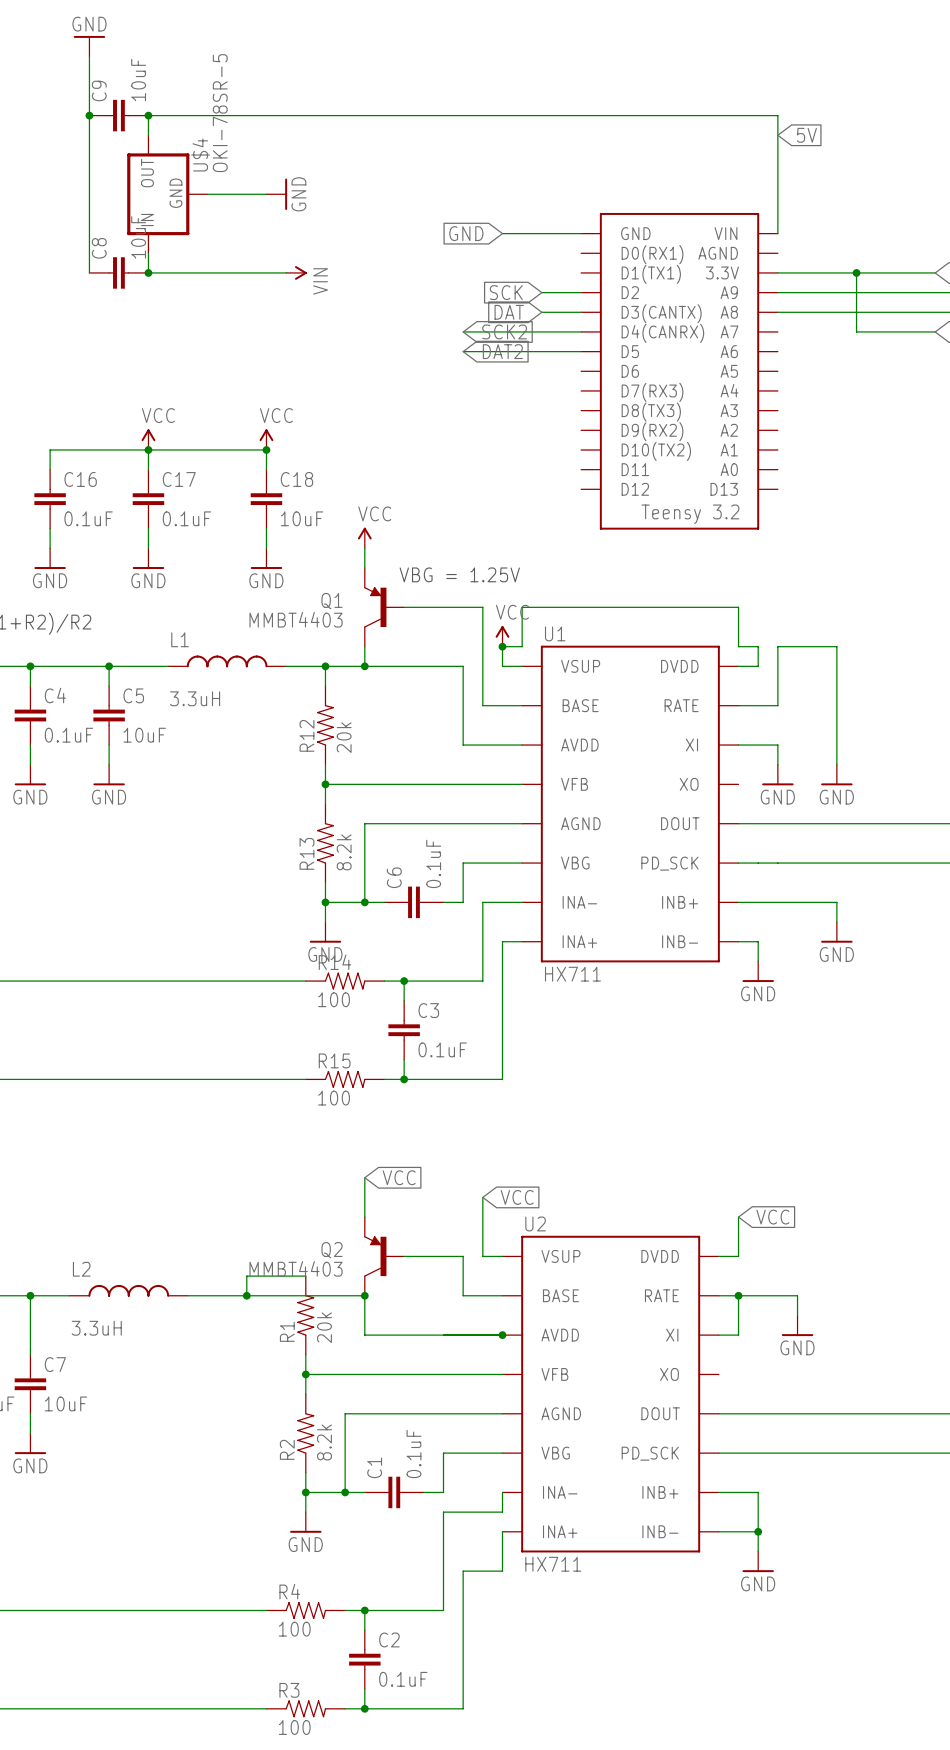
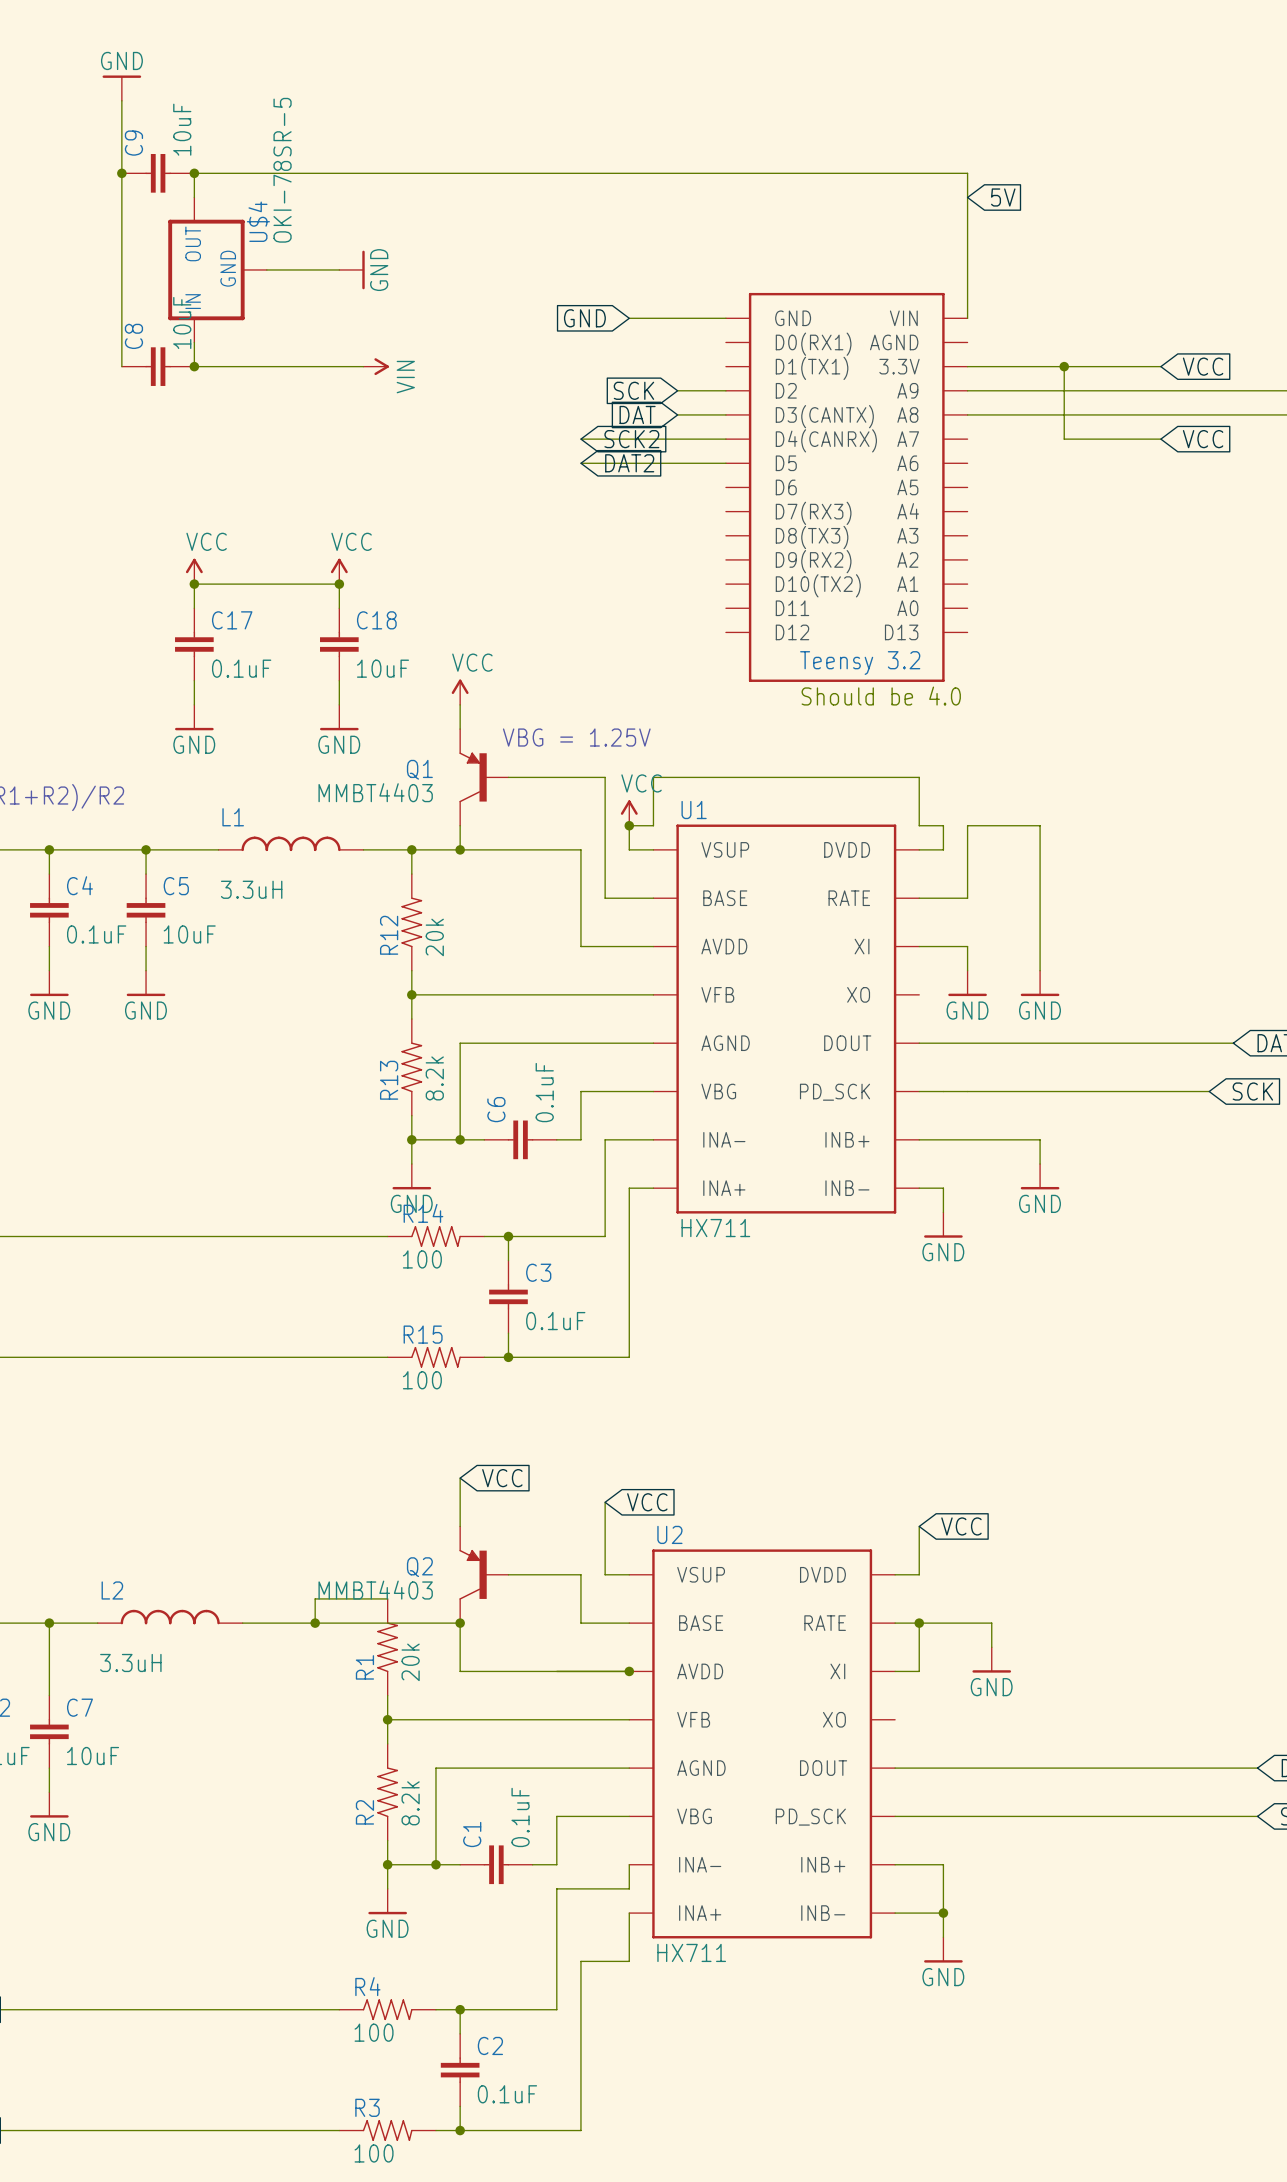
wire: (148, 449) (50, 449) (50, 469) -> none
C16: 0.1uF (50, 499) -> none
wire: (50, 528) (50, 548) -> none
text: none -> Should be 4.0 (881, 696)
power symbol: GND (50, 558) -> none

